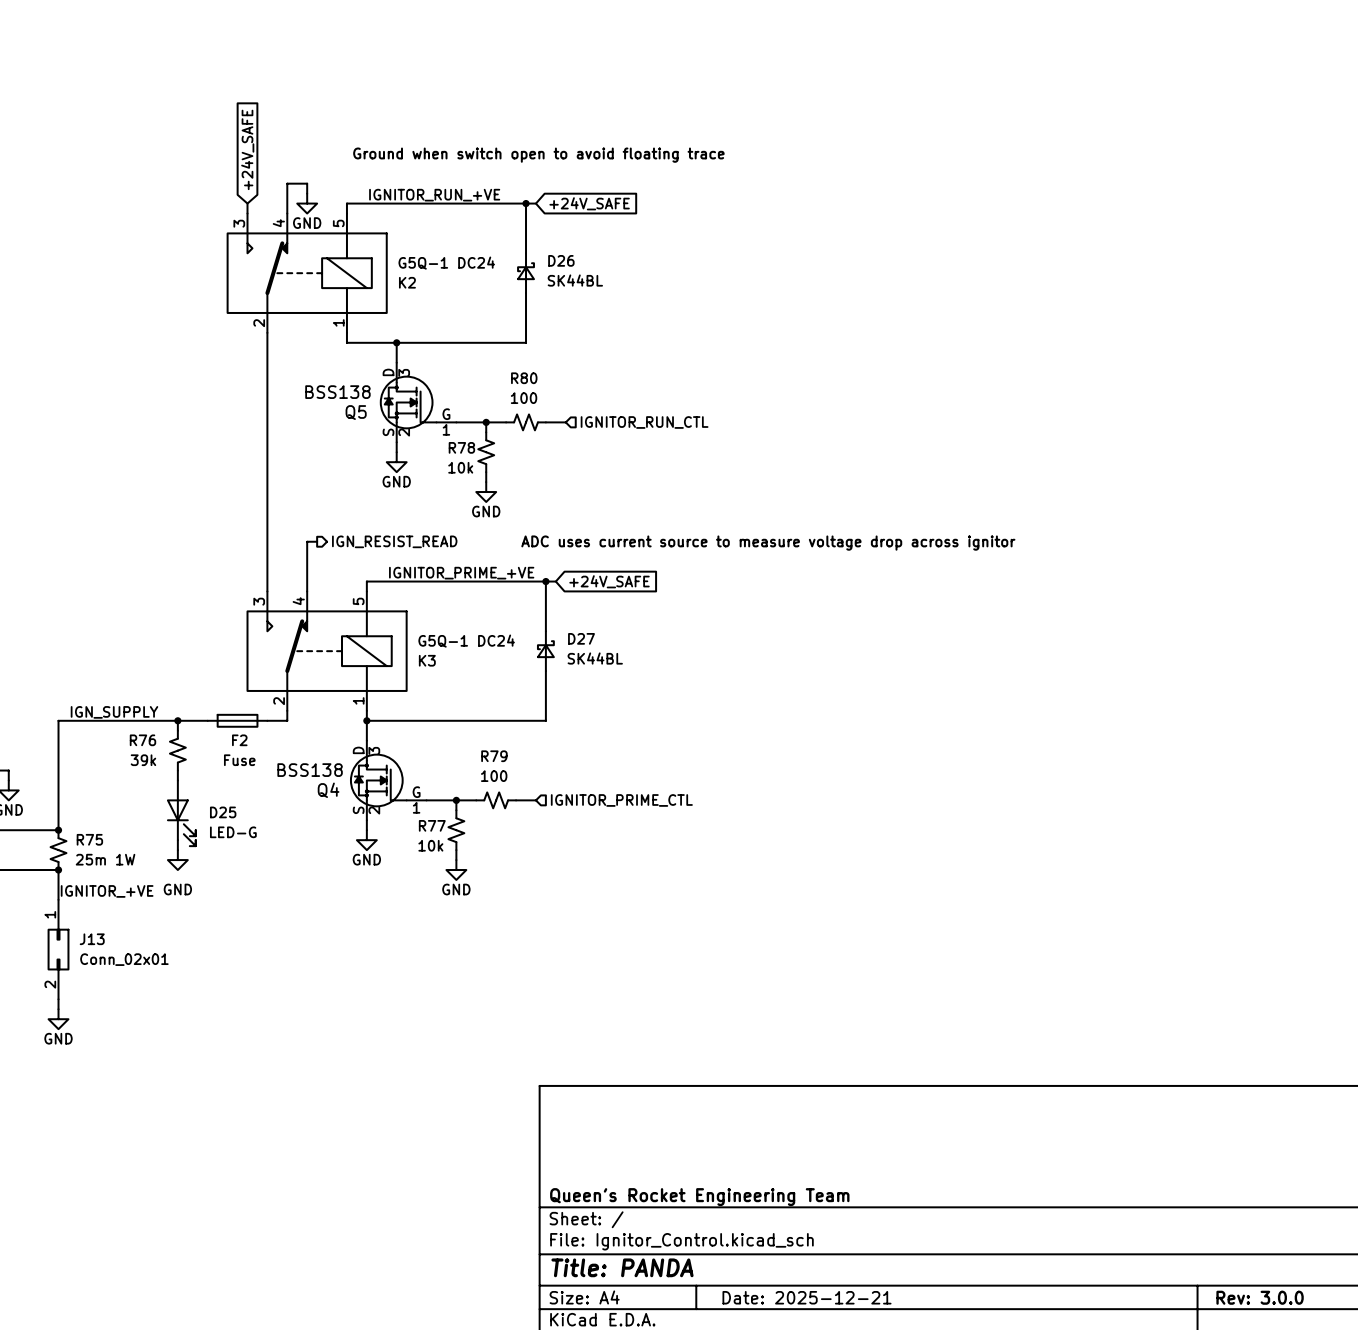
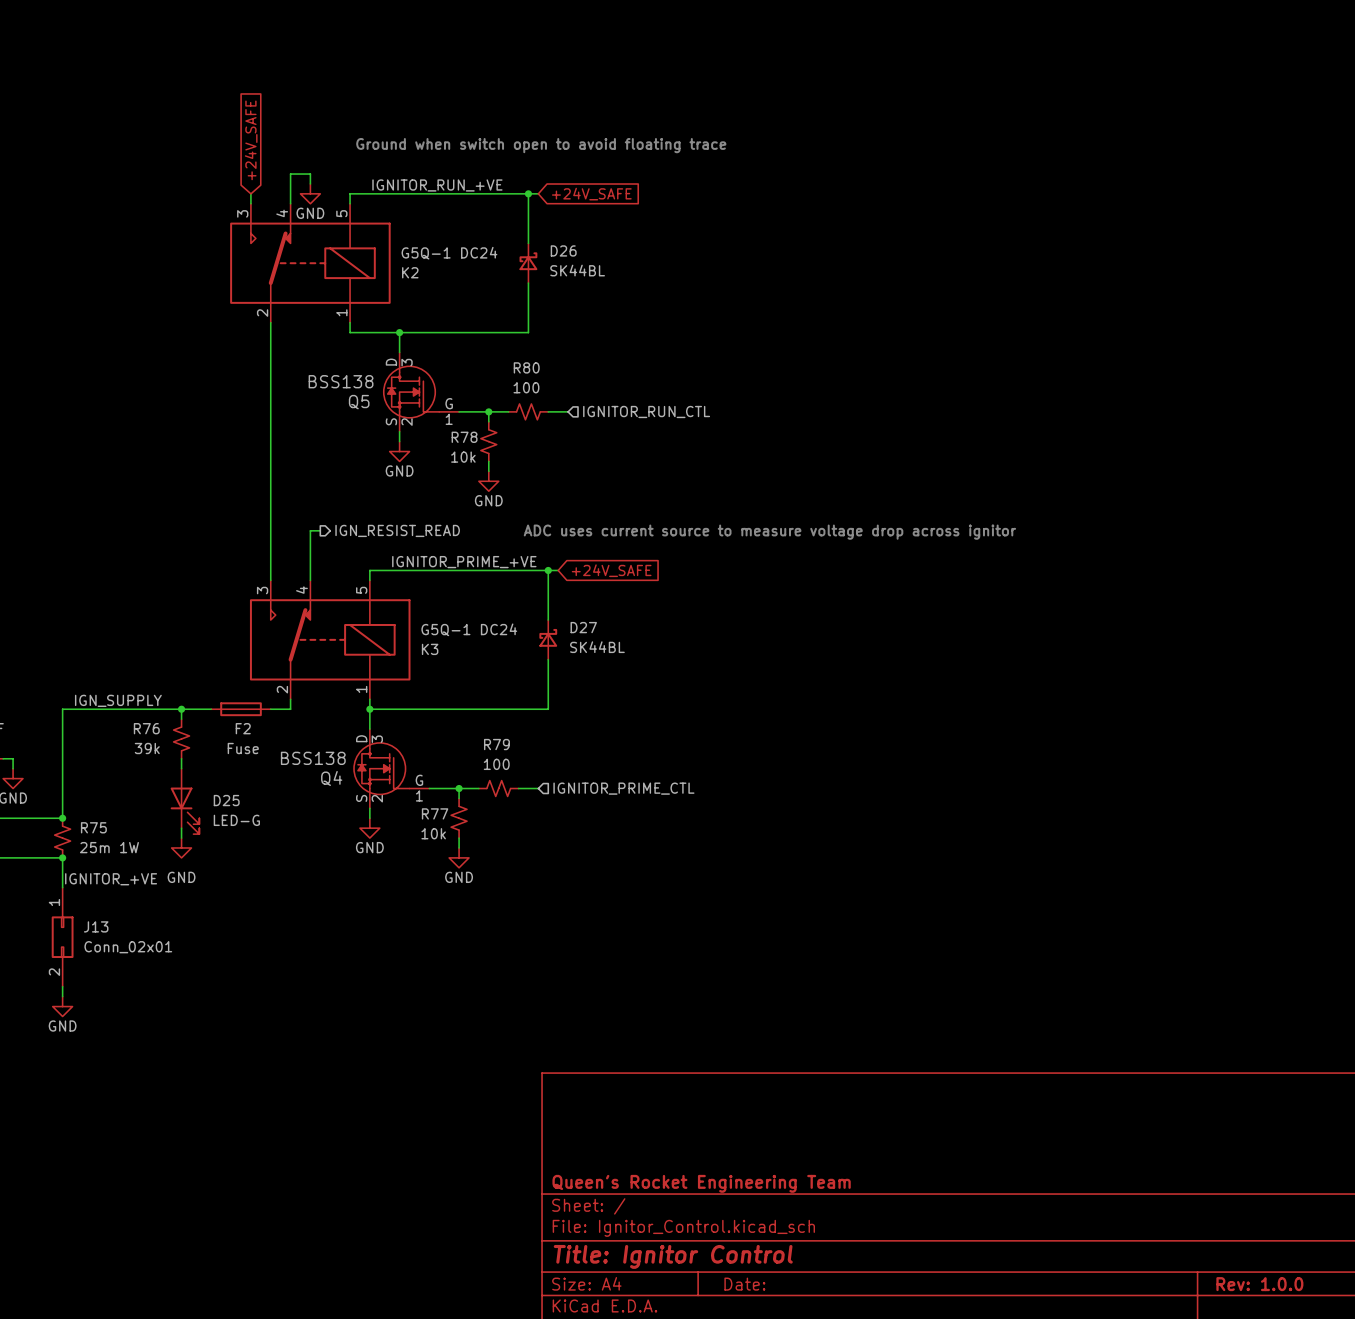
title block: Title: PANDA (622, 1267) -> Title: Ignitor Control (673, 1256)
title block: Date: 2025-12-21 (807, 1297) -> Date: (744, 1284)
title block: Rev: 3.0.0 (1260, 1297) -> Rev: 1.0.0 (1259, 1284)

